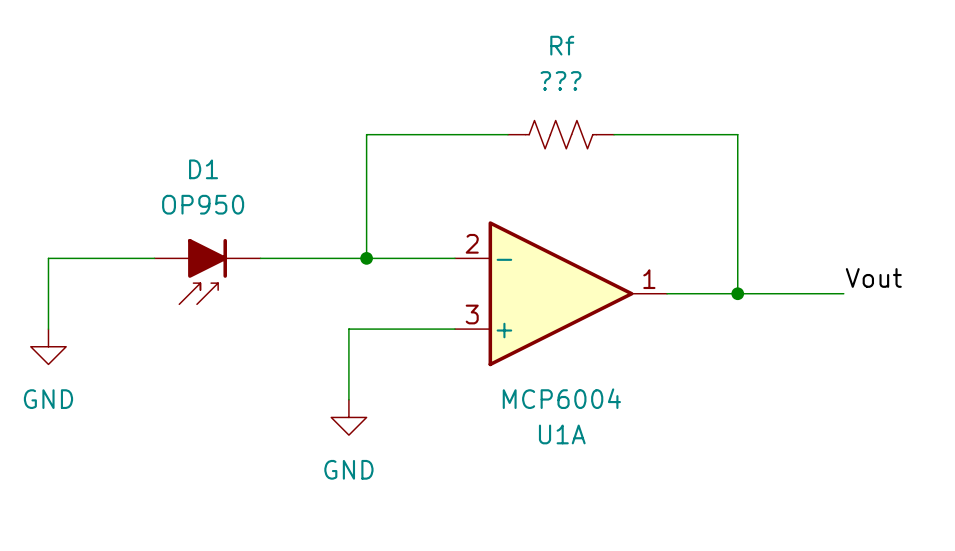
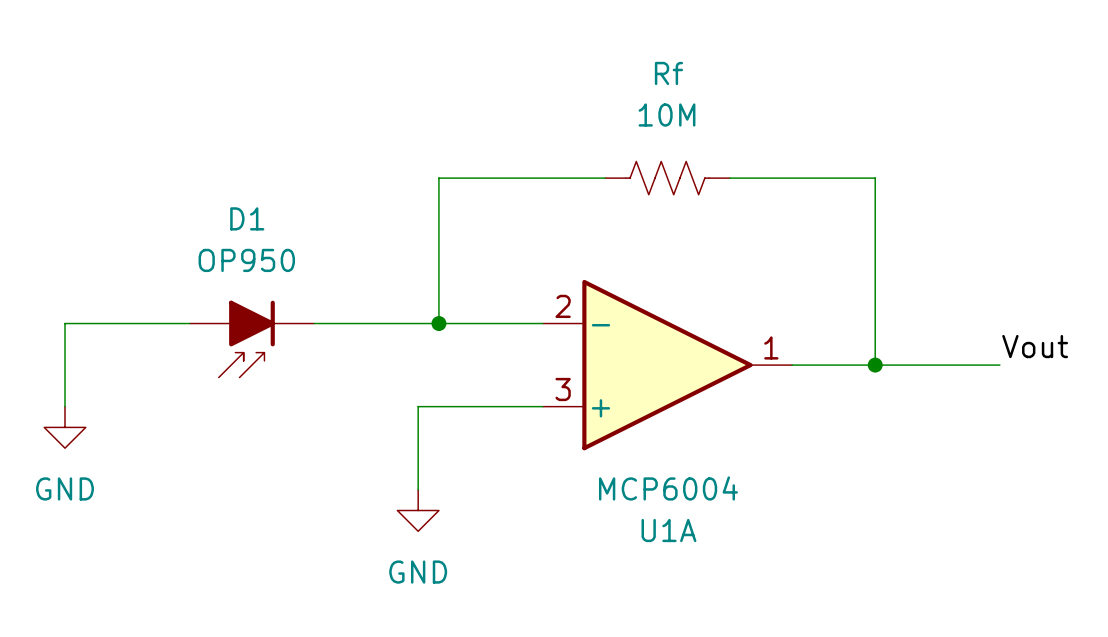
Rf value: ??? (561, 80) -> 10M (666, 115)

